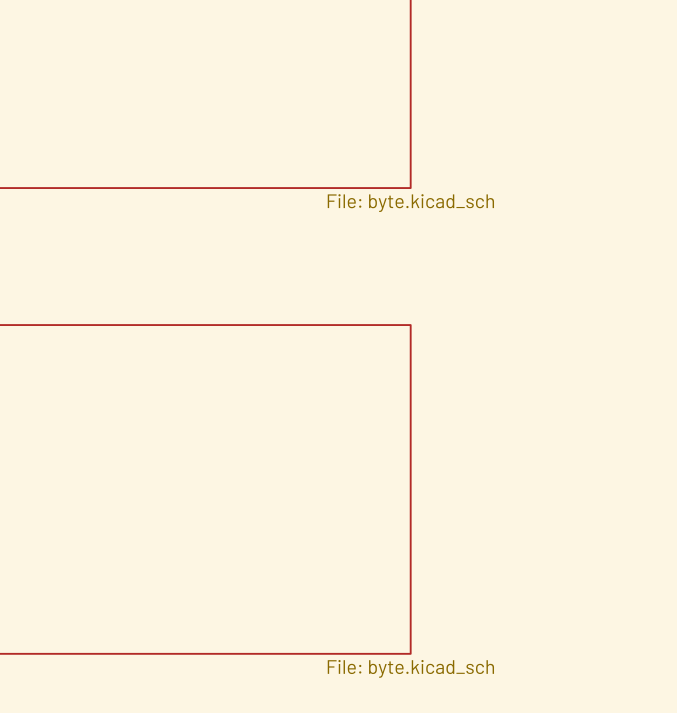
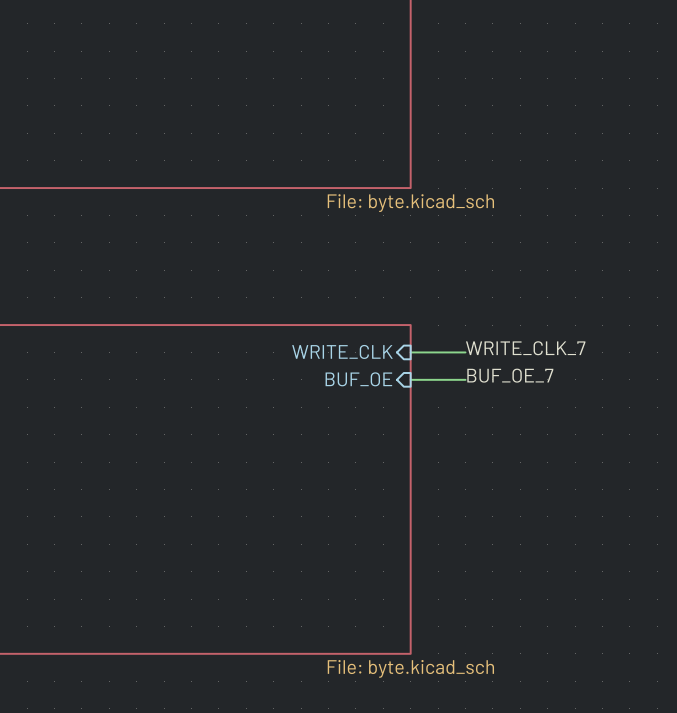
label: none -> WRITE_CLK_7 (525, 348)
sheet pin: none -> WRITE_CLK (342, 351)
wire: none -> (410, 352) (465, 352)
label: none -> BUF_OE_7 (510, 375)
sheet pin: none -> BUF_OE (358, 379)
wire: none -> (410, 379) (465, 379)

